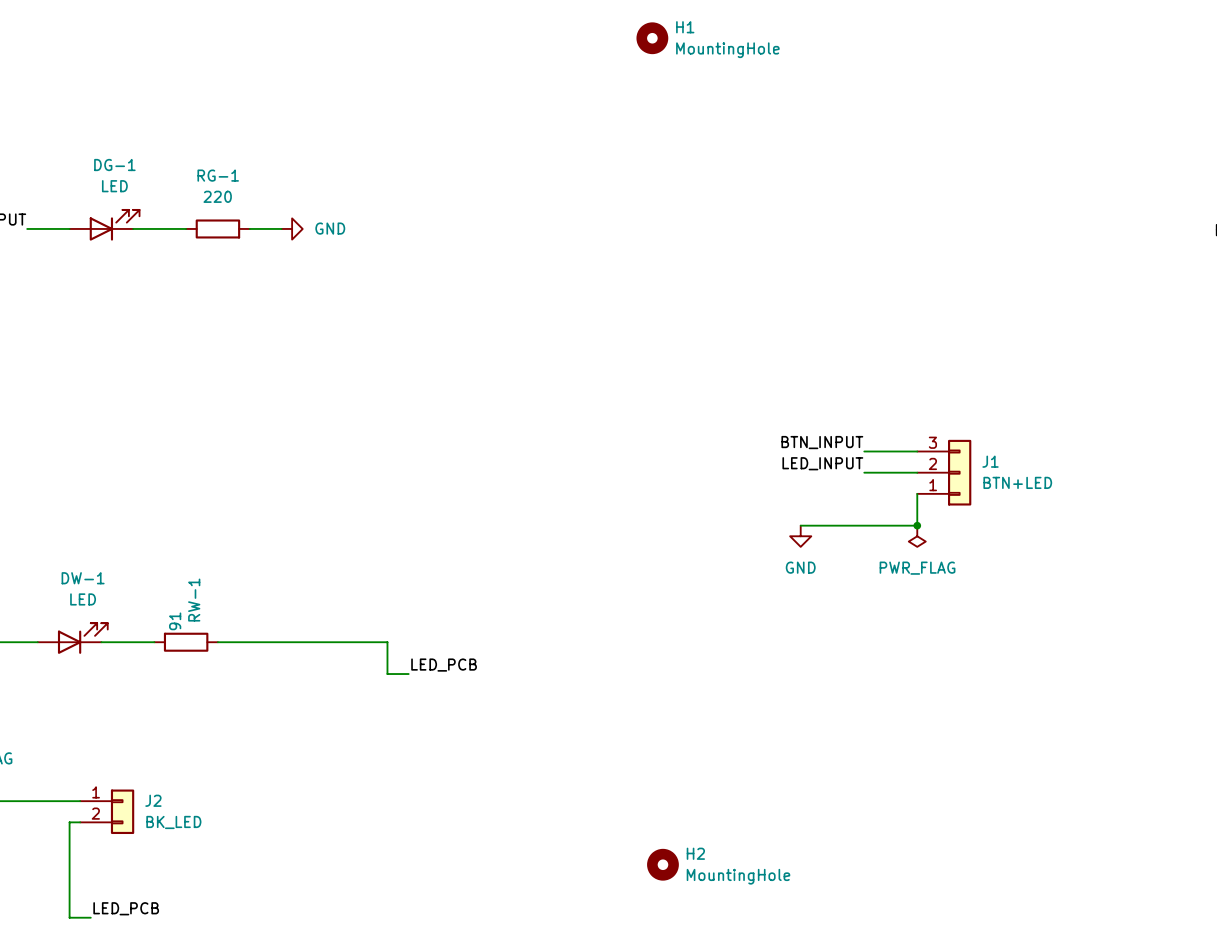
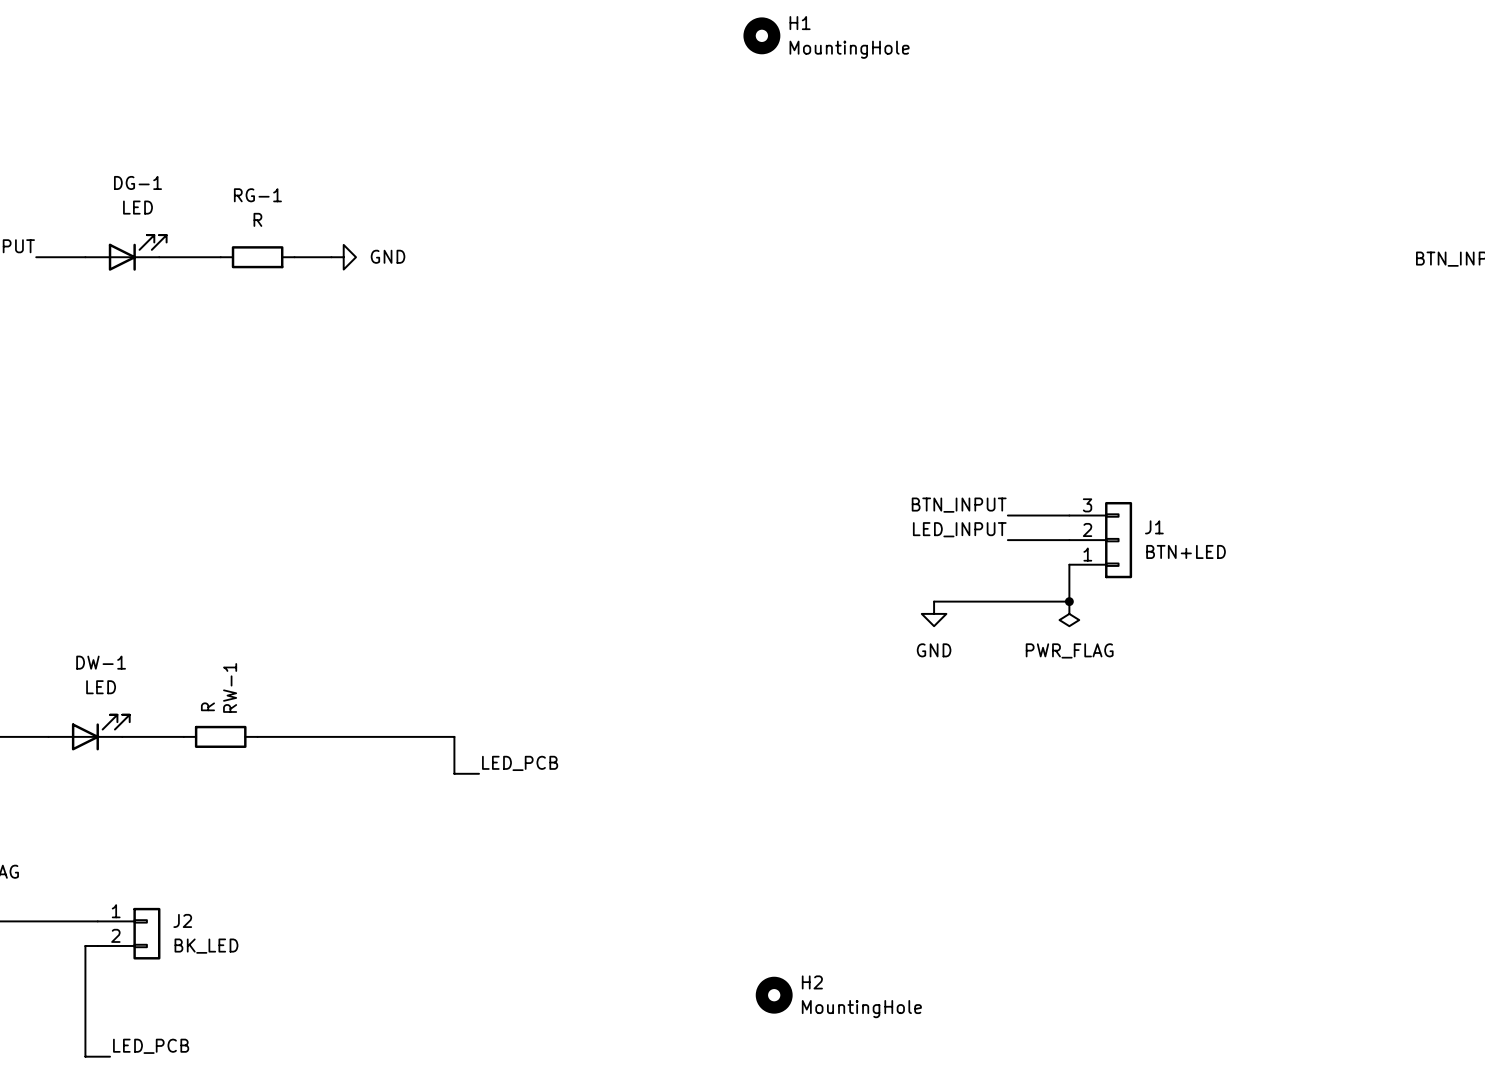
RG-1 value: 220 (217, 196) -> R (257, 219)
RW-1 value: 91 (175, 621) -> R (207, 706)

